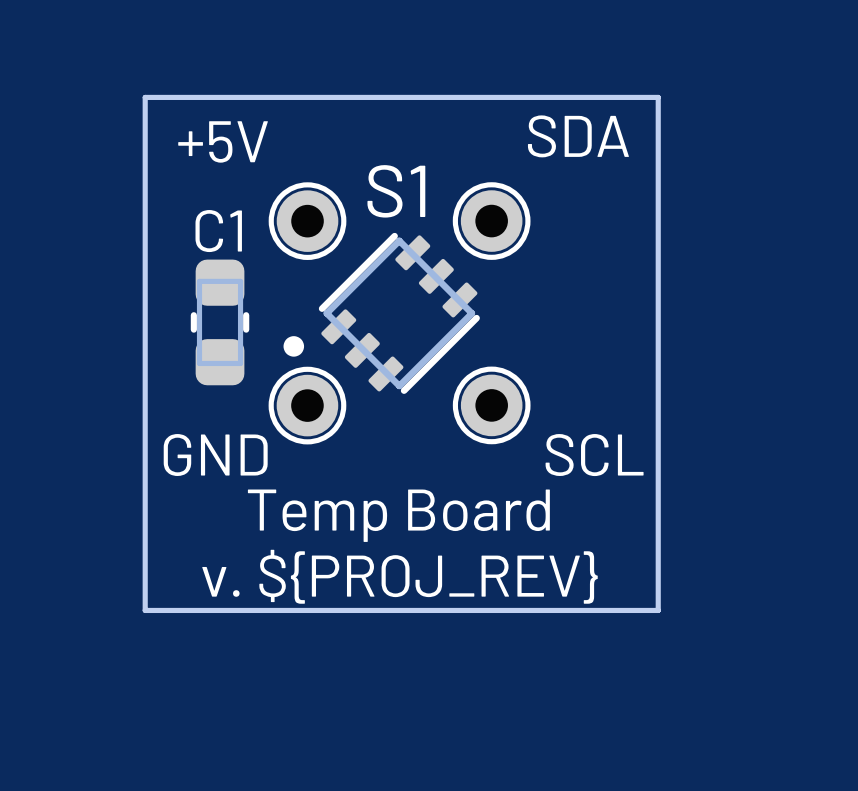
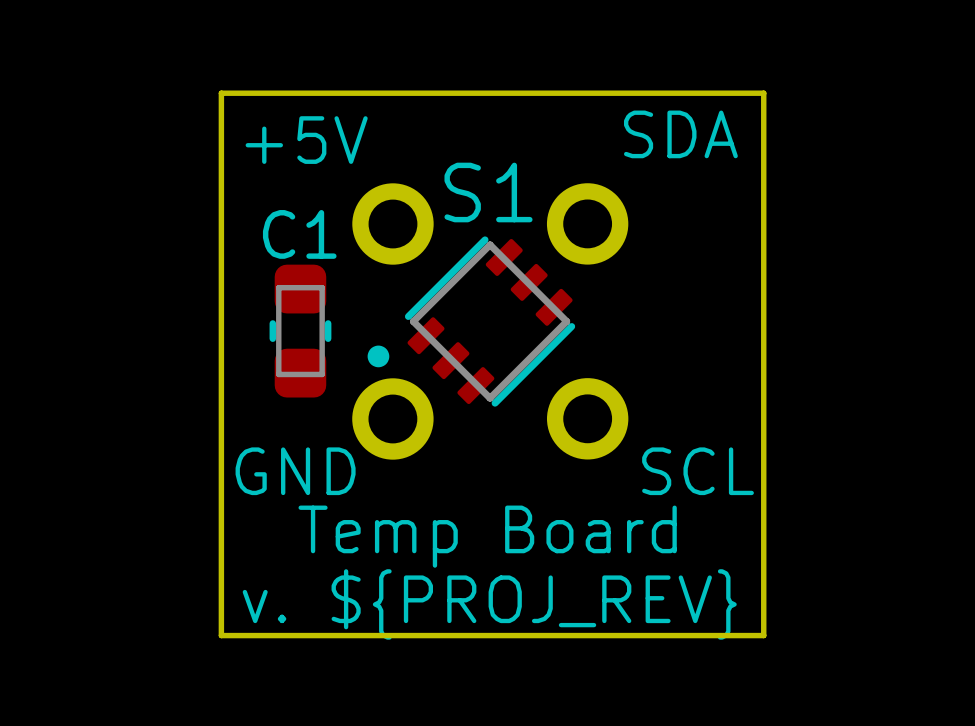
part footprint: [268, 182, 347, 260] -> [352, 183, 434, 265]
part footprint: [452, 182, 531, 260] -> [546, 183, 629, 265]
part footprint: [268, 366, 347, 445] -> [352, 378, 434, 460]
part footprint: [452, 366, 531, 445] -> [546, 378, 629, 460]

